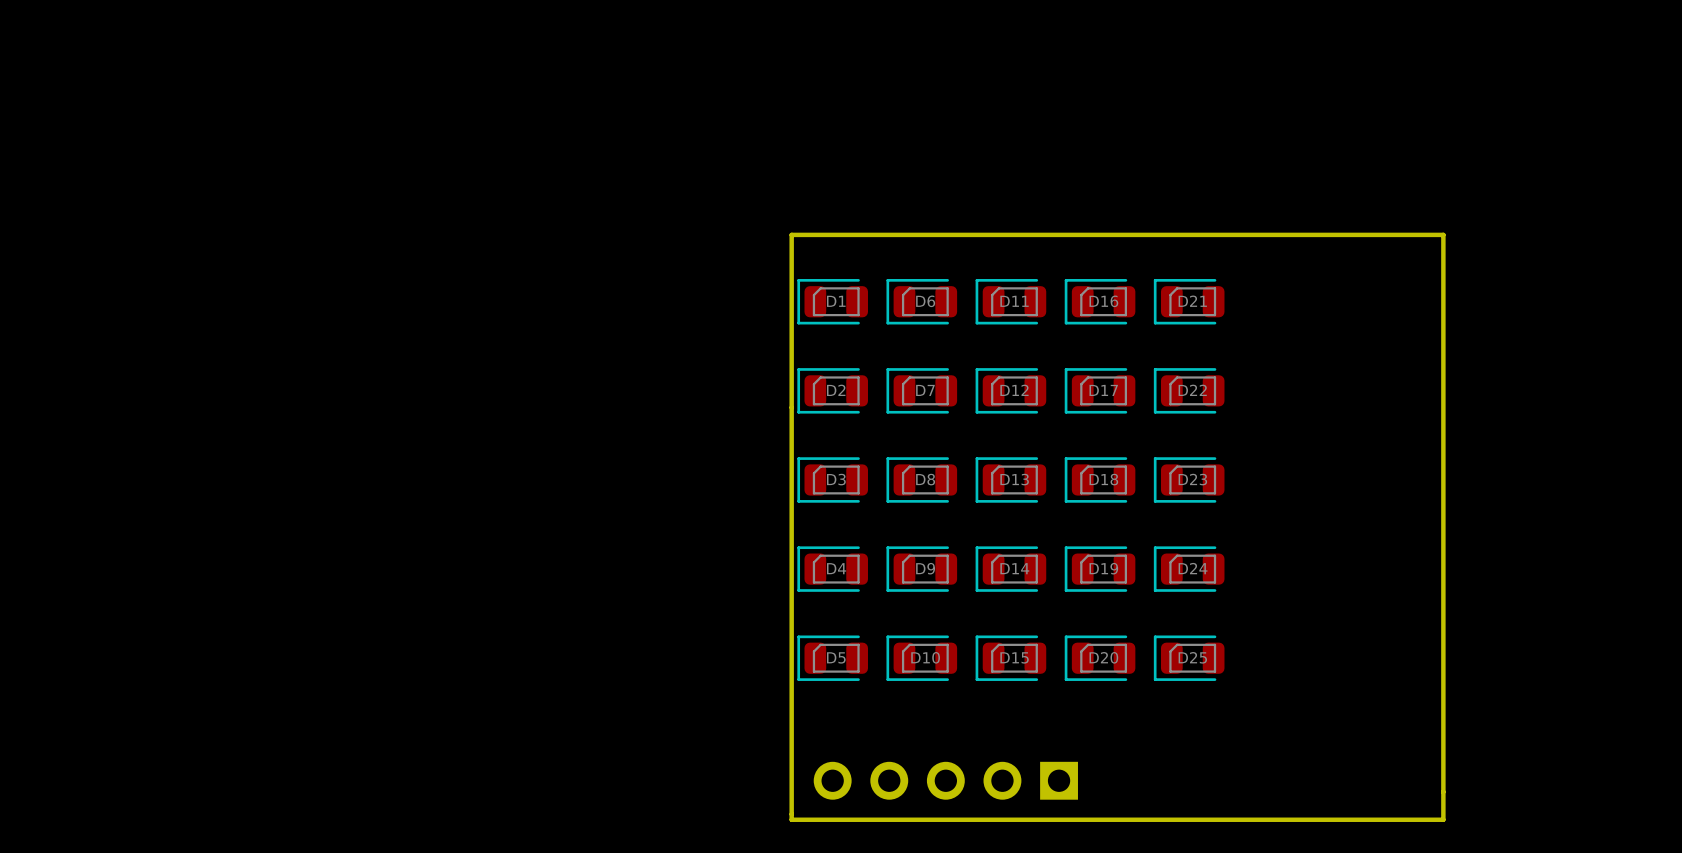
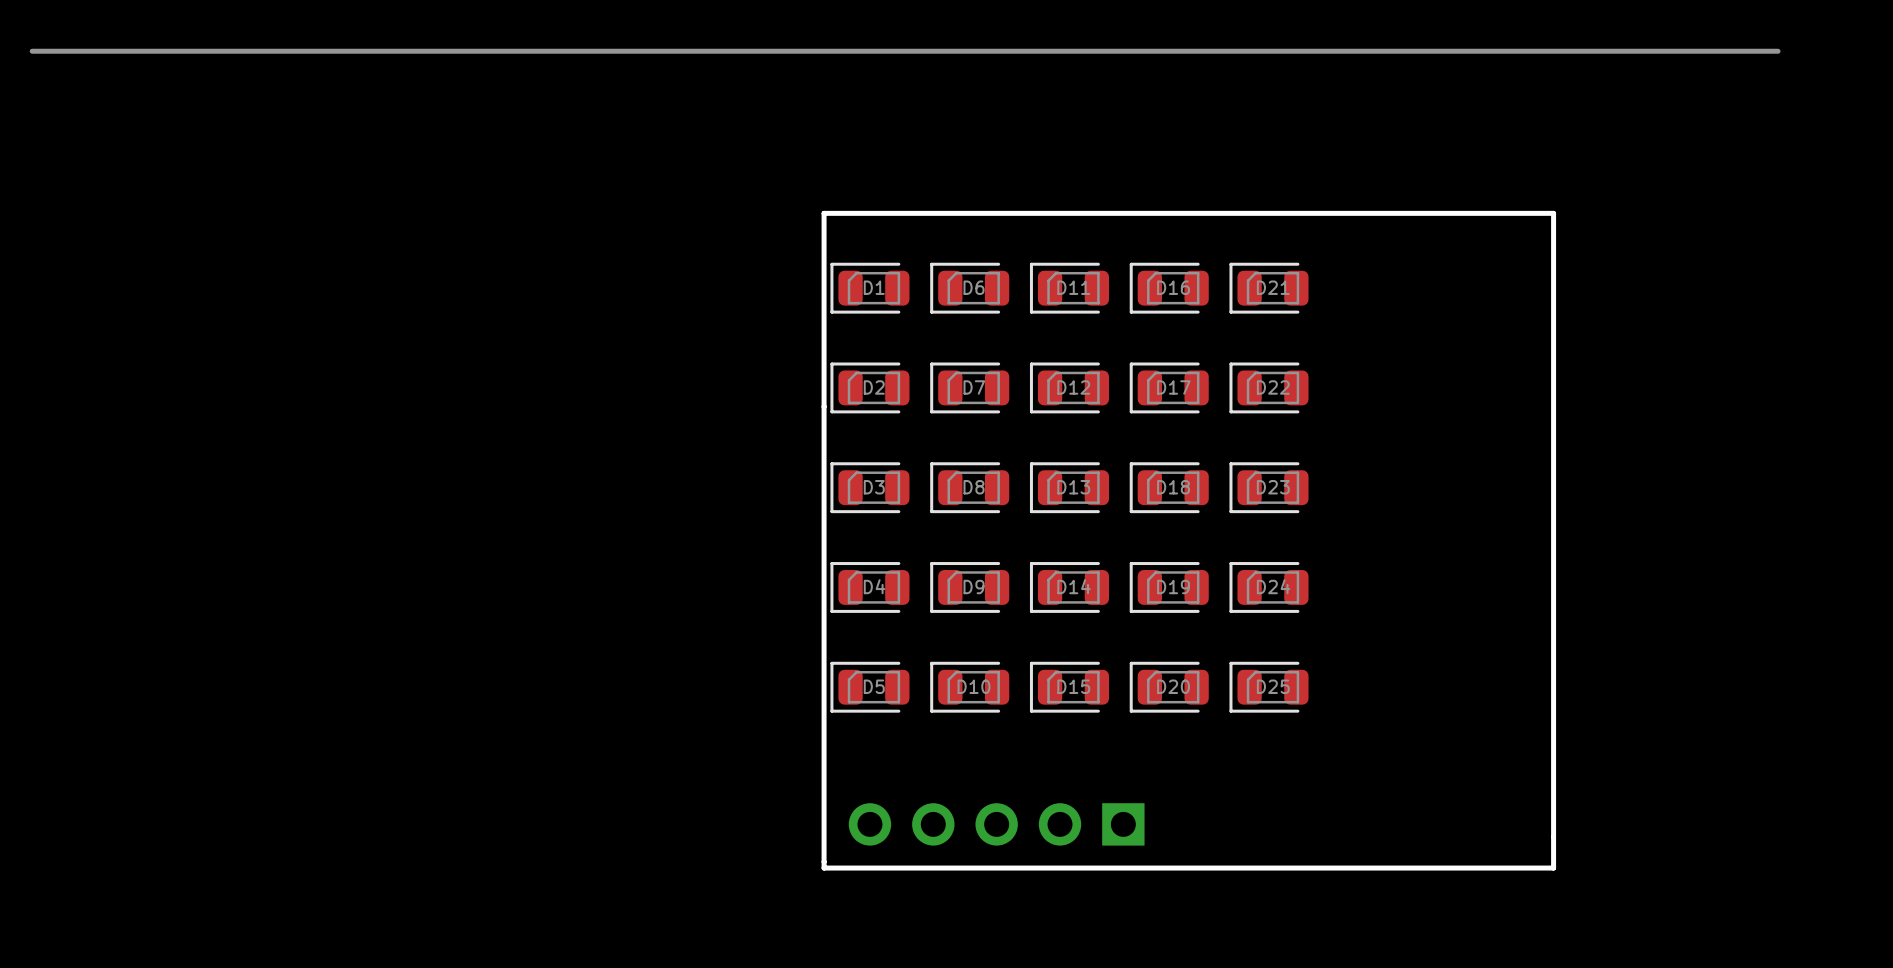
line: none -> (32, 51) (1778, 51)

